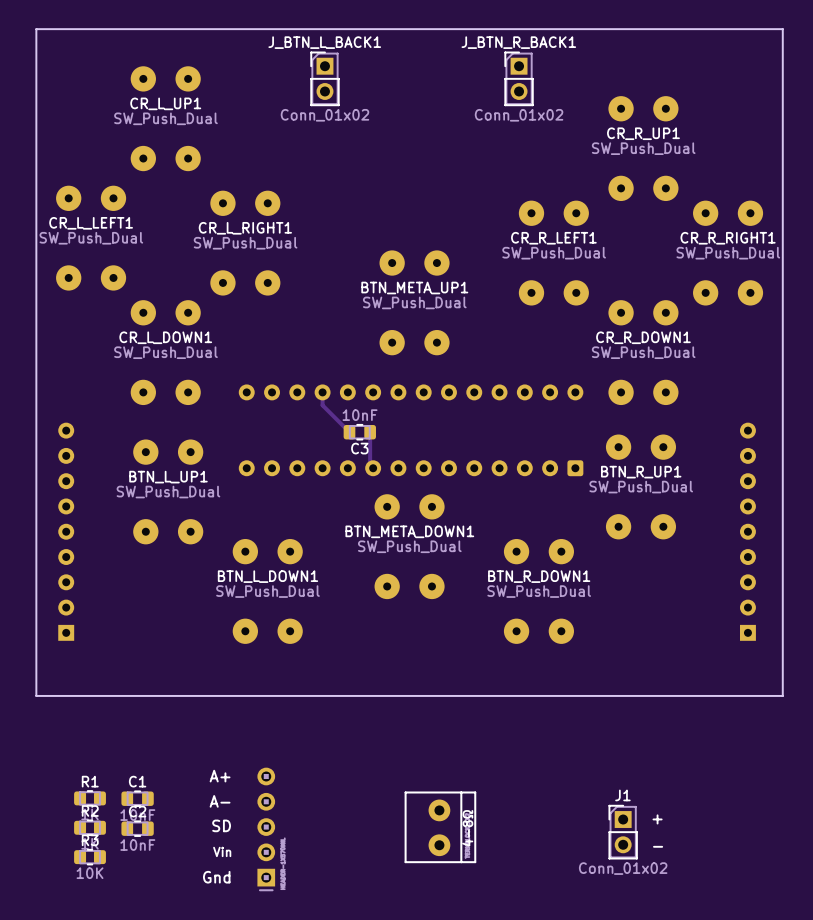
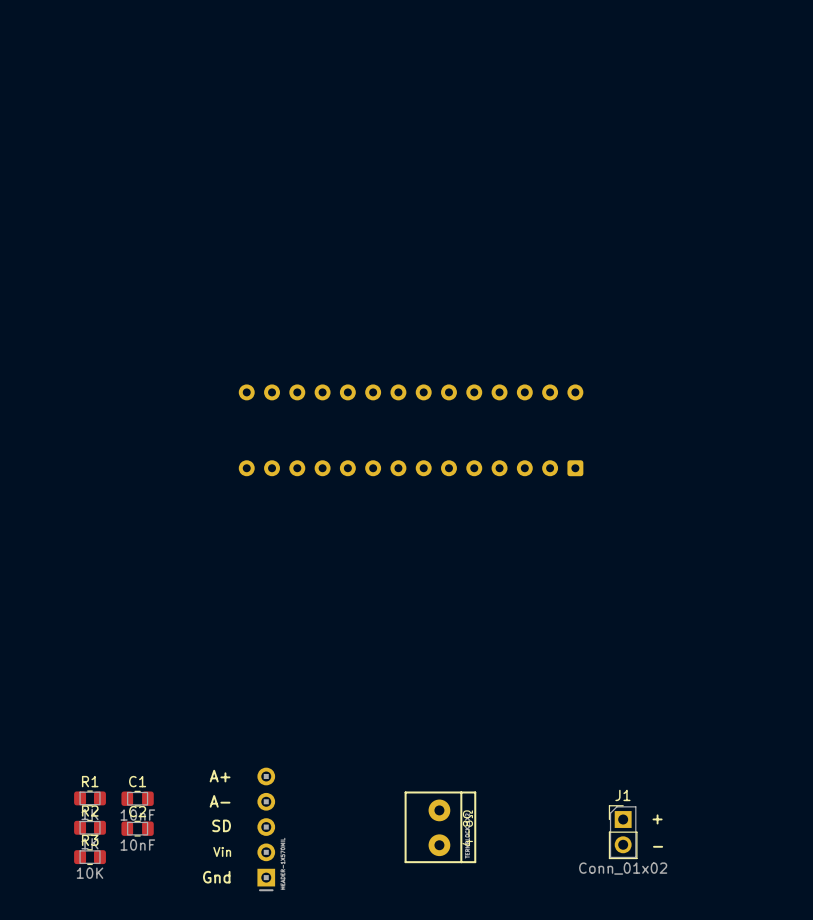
board edge: (36, 29) (782, 29) (782, 695) (36, 695) (36, 29) -> none
J_BTN_L_BACK1: Conn_01x02 (324, 78) -> none
J_BTN_R_BACK1: Conn_01x02 (519, 78) -> none
CR_L_UP1: SW_Push_Dual (165, 118) -> none
CR_R_UP1: SW_Push_Dual (643, 148) -> none
CR_L_LEFT1: SW_Push_Dual (91, 238) -> none
CR_L_RIGHT1: SW_Push_Dual (245, 243) -> none
CR_R_LEFT1: SW_Push_Dual (553, 253) -> none
CR_R_RIGHT1: SW_Push_Dual (728, 253) -> none
BTN_META_UP1: SW_Push_Dual (414, 302) -> none
CR_L_DOWN1: SW_Push_Dual (165, 352) -> none
CR_R_DOWN1: SW_Push_Dual (643, 352) -> none
track: (322, 392) (322, 405) (349, 432) -> none
C3: 10nF (359, 432) -> none
track: (370, 432) (370, 465) (373, 468) -> none
BTN_R_UP1: SW_Push_Dual (640, 486) -> none
BTN_L_UP1: SW_Push_Dual (168, 491) -> none
part: (66, 531) -> none
part: (747, 531) -> none
BTN_META_DOWN1: SW_Push_Dual (409, 546) -> none
BTN_L_DOWN1: SW_Push_Dual (267, 591) -> none
BTN_R_DOWN1: SW_Push_Dual (538, 591) -> none

